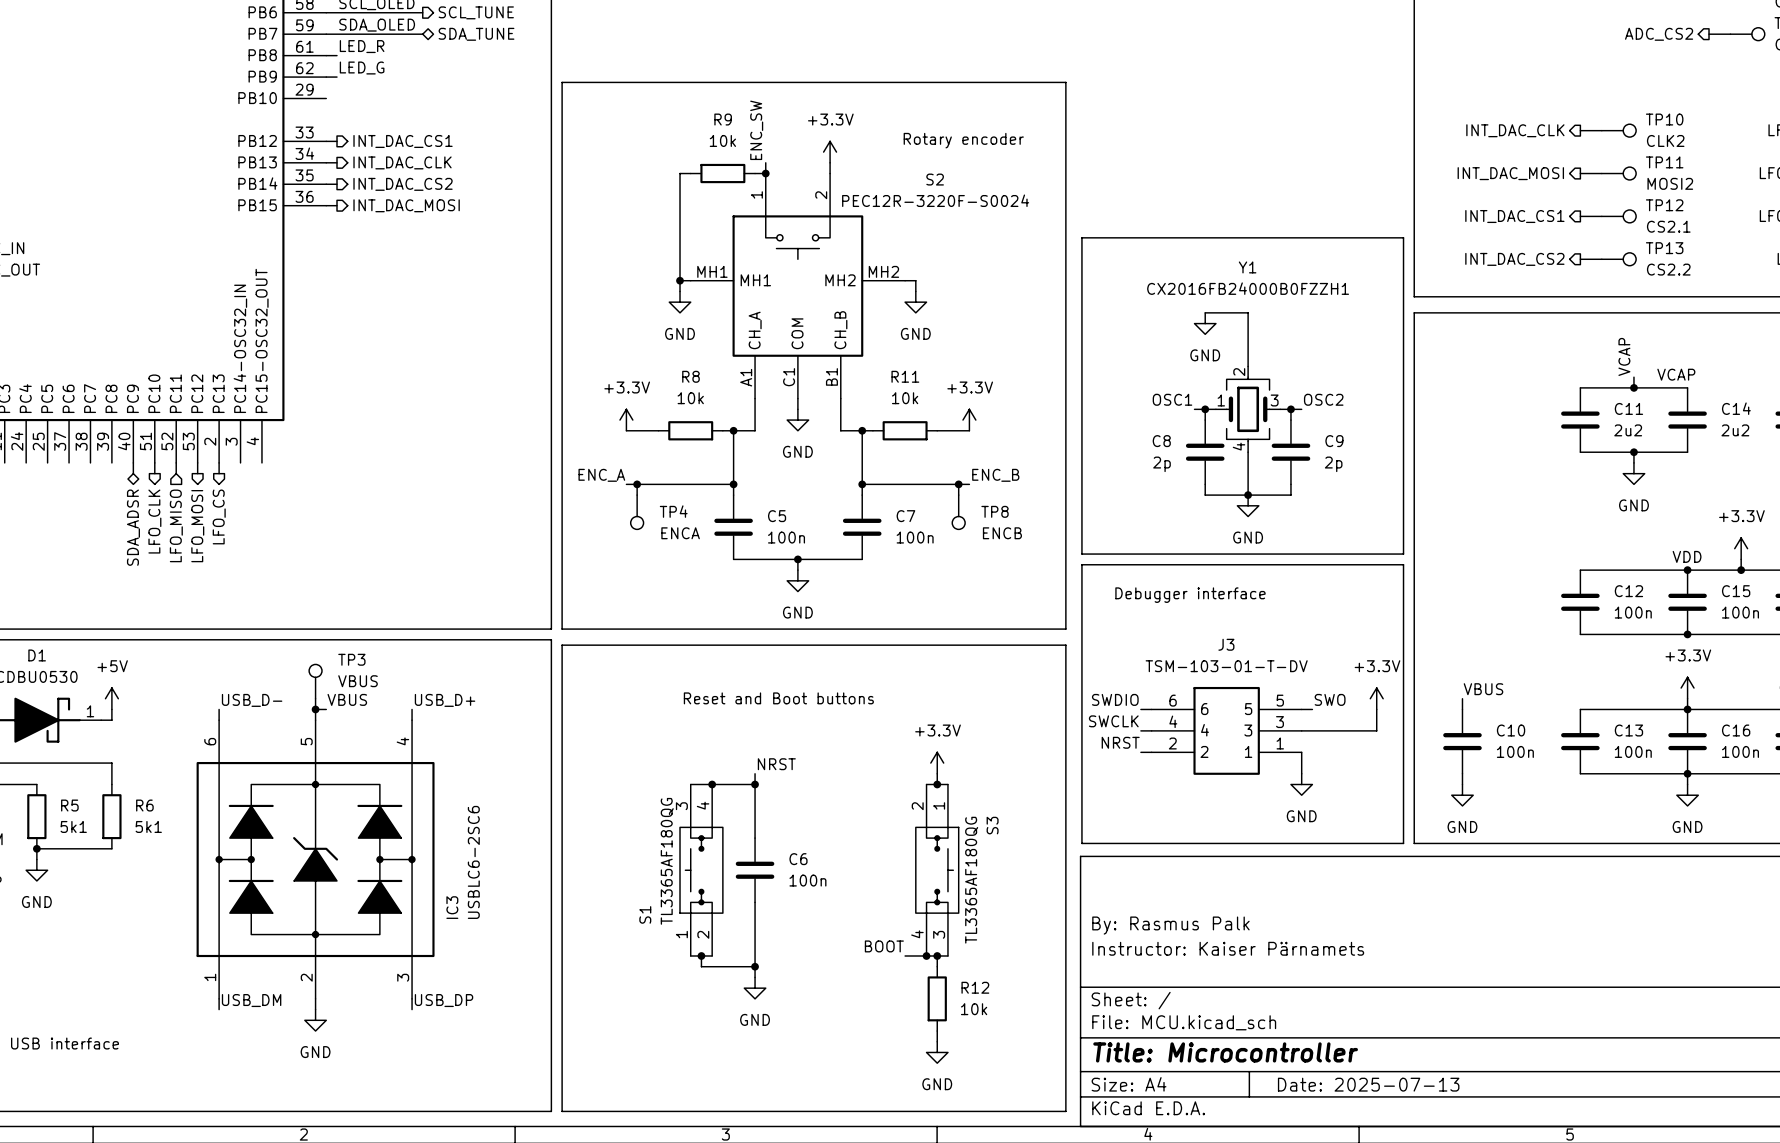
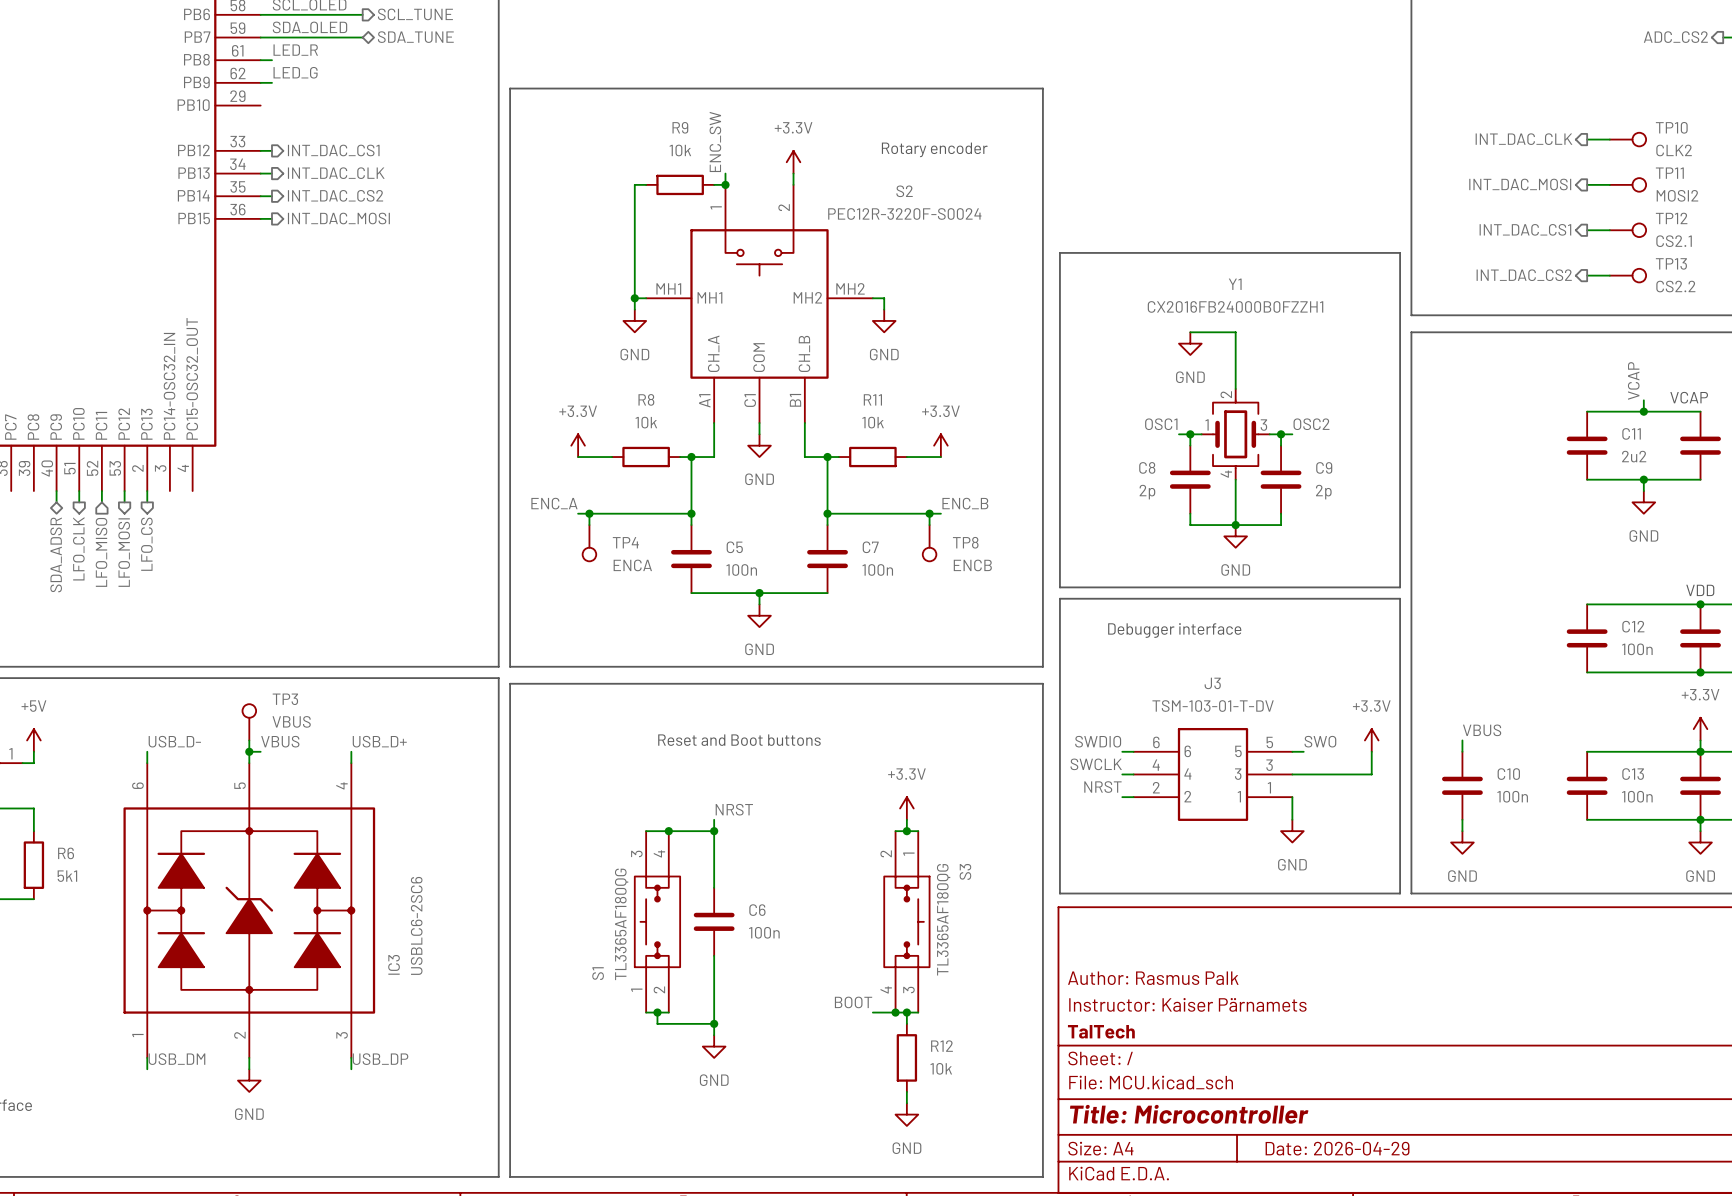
title block: By: Rasmus Palk (1170, 925) -> Author: Rasmus Palk (1153, 978)
title block: none -> TalTech (1101, 1031)
title block: Date: 2025-07-13 (1368, 1084) -> Date: 2026-04-29 (1337, 1148)

